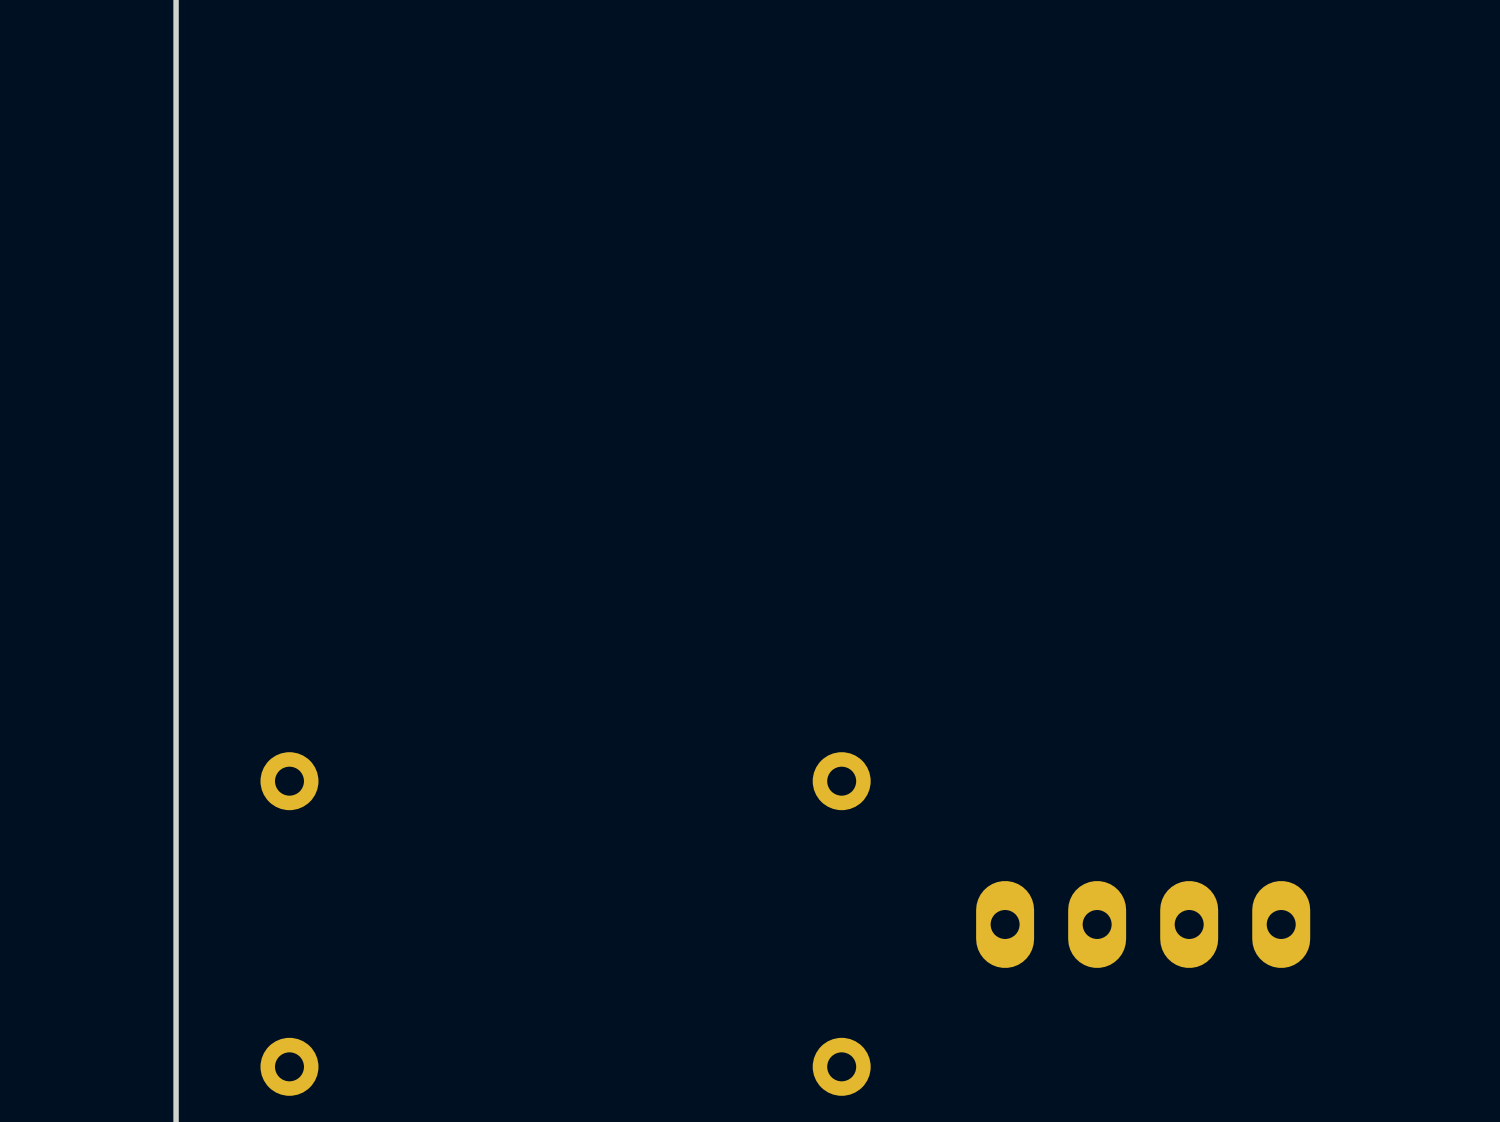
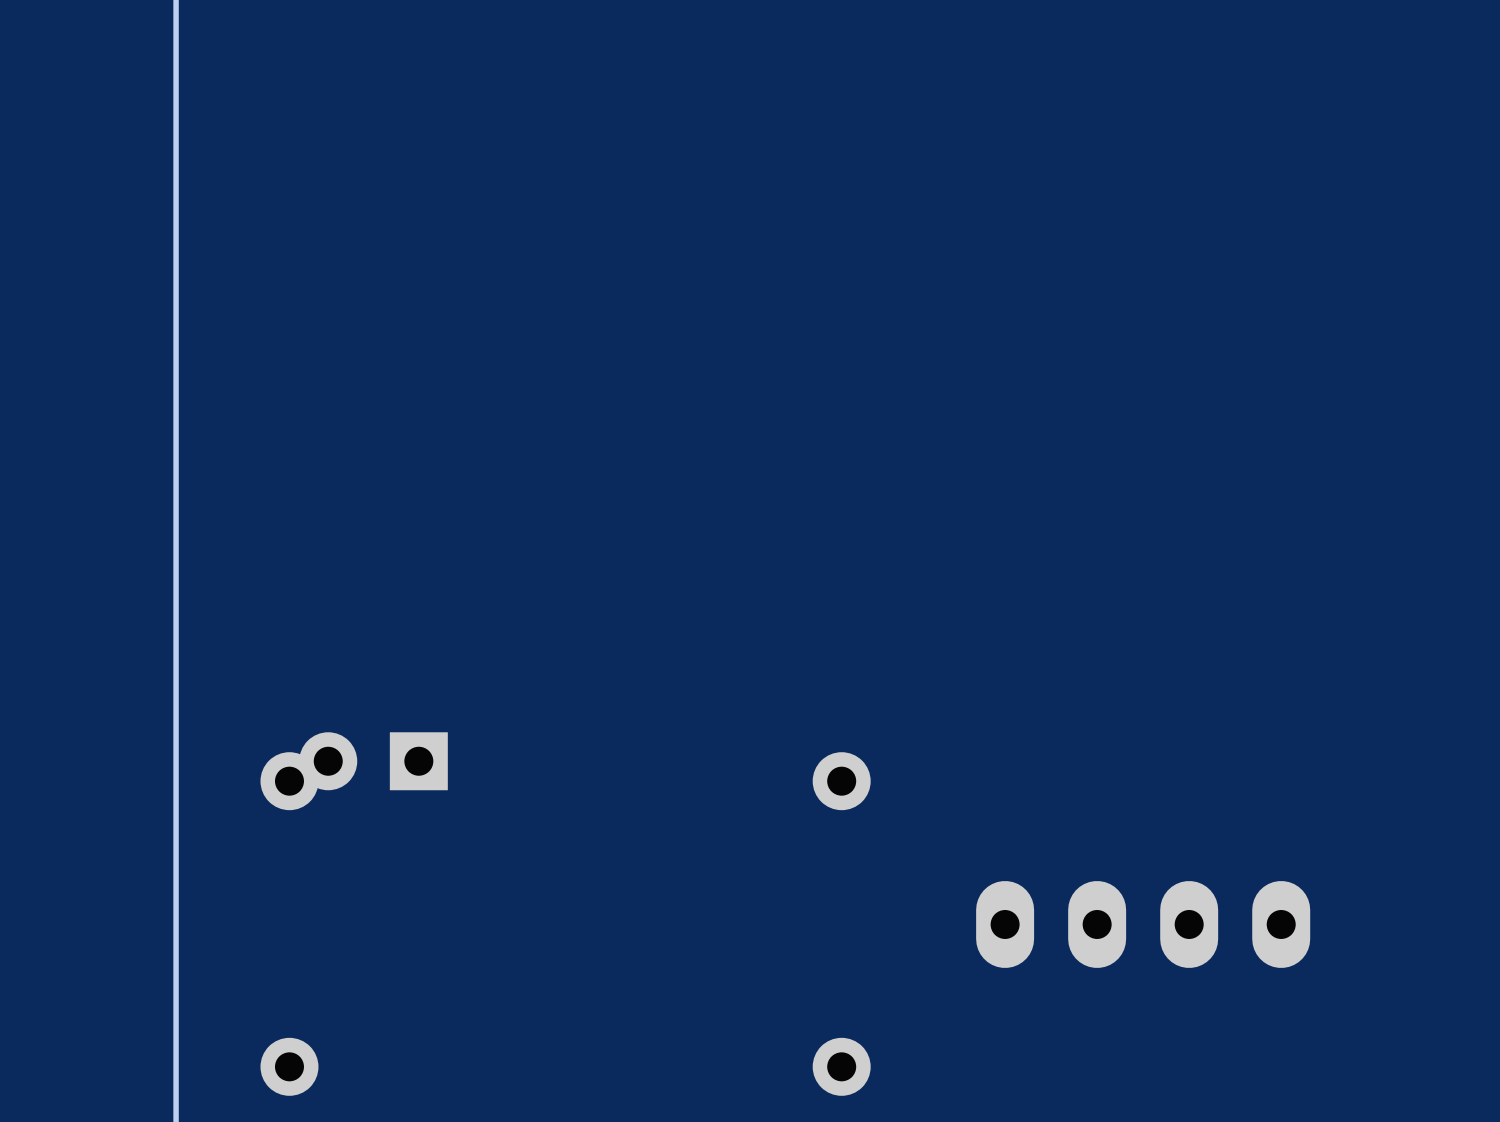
part: none -> (373, 761)

